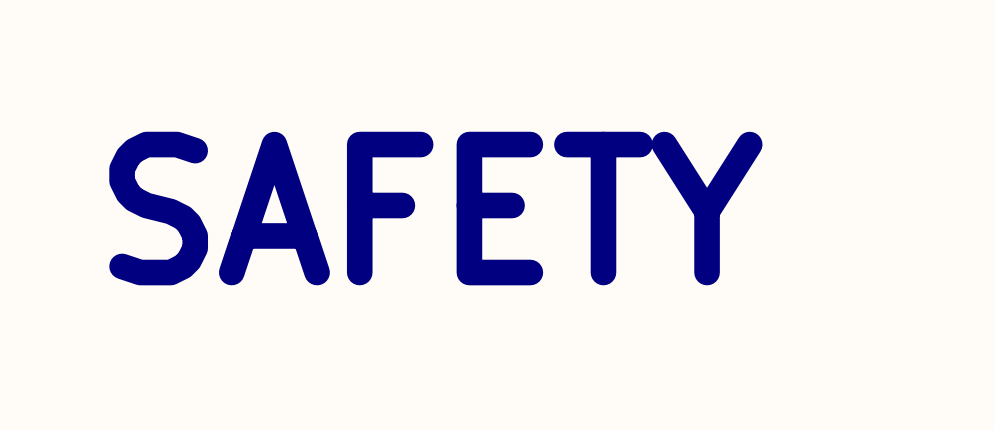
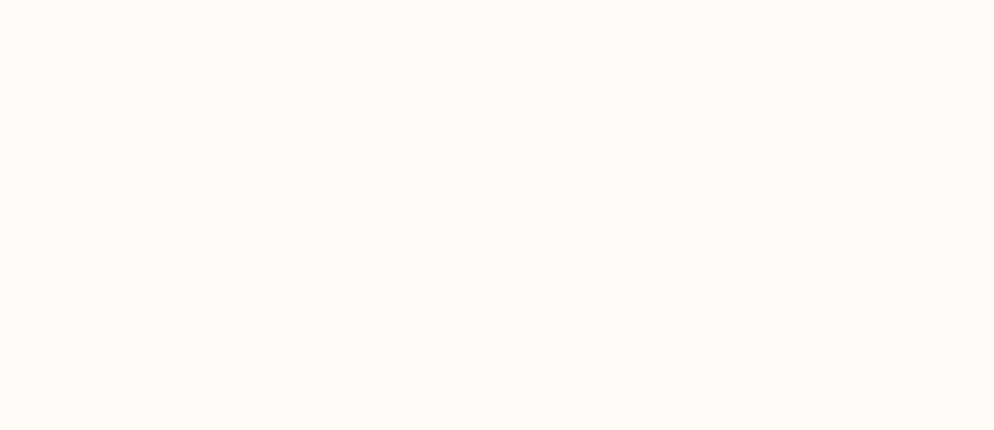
text: SAFETY (435, 208) -> none

